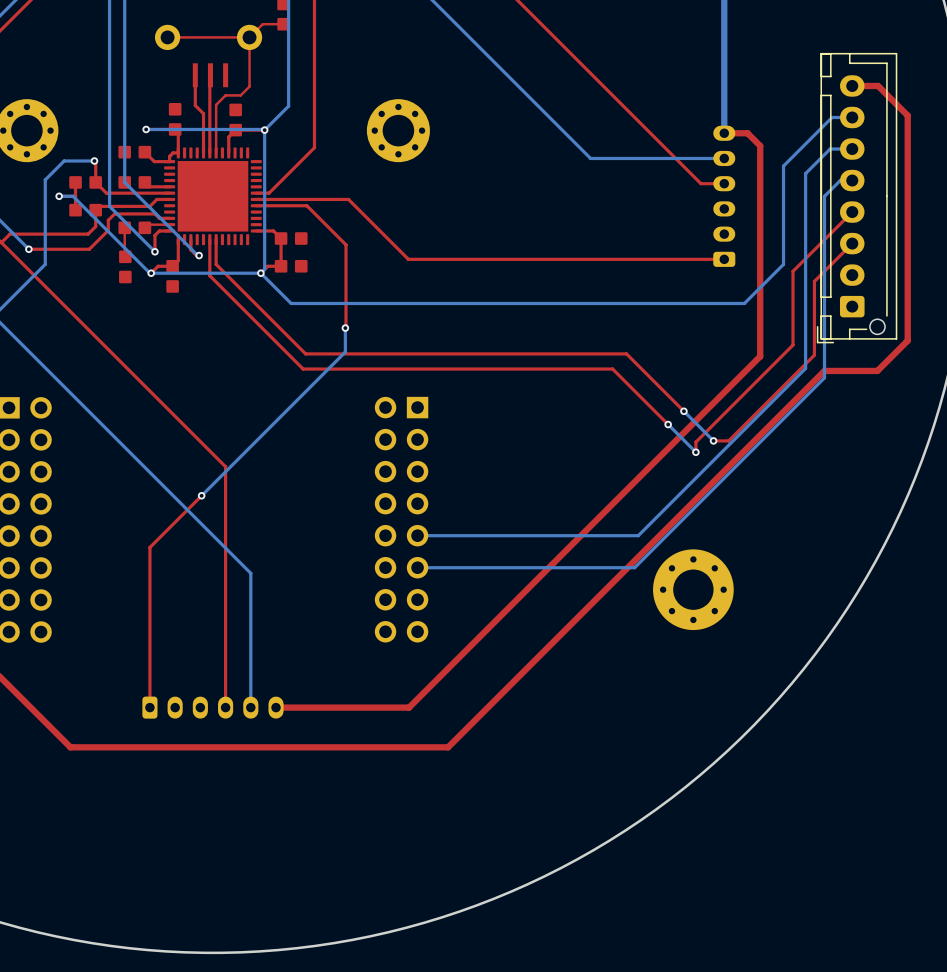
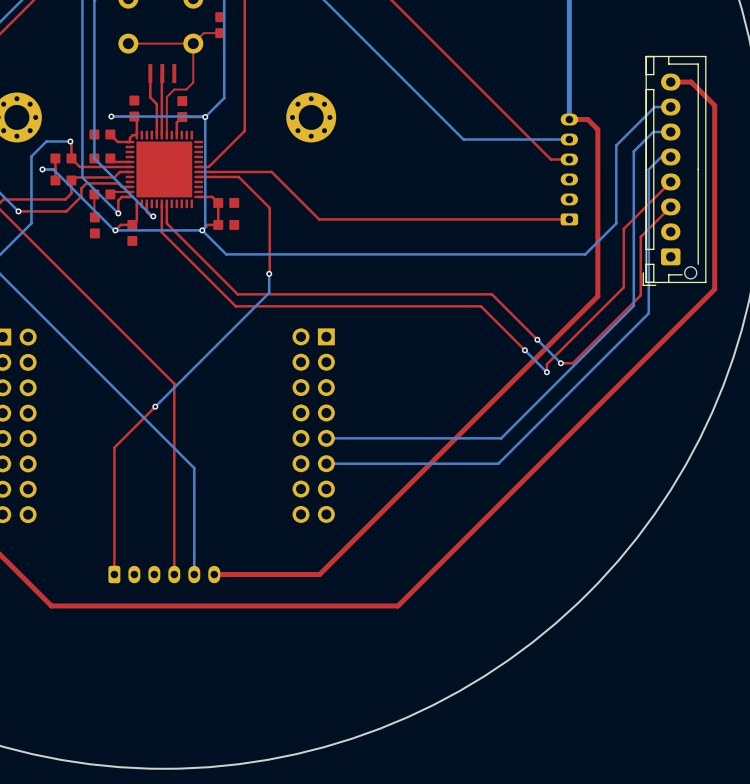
top track: (907, 340) (877, 370) (824, 370) (448, 747) -> (714, 283) (714, 289) (398, 605) (350, 605)
part: (693, 589) -> none

